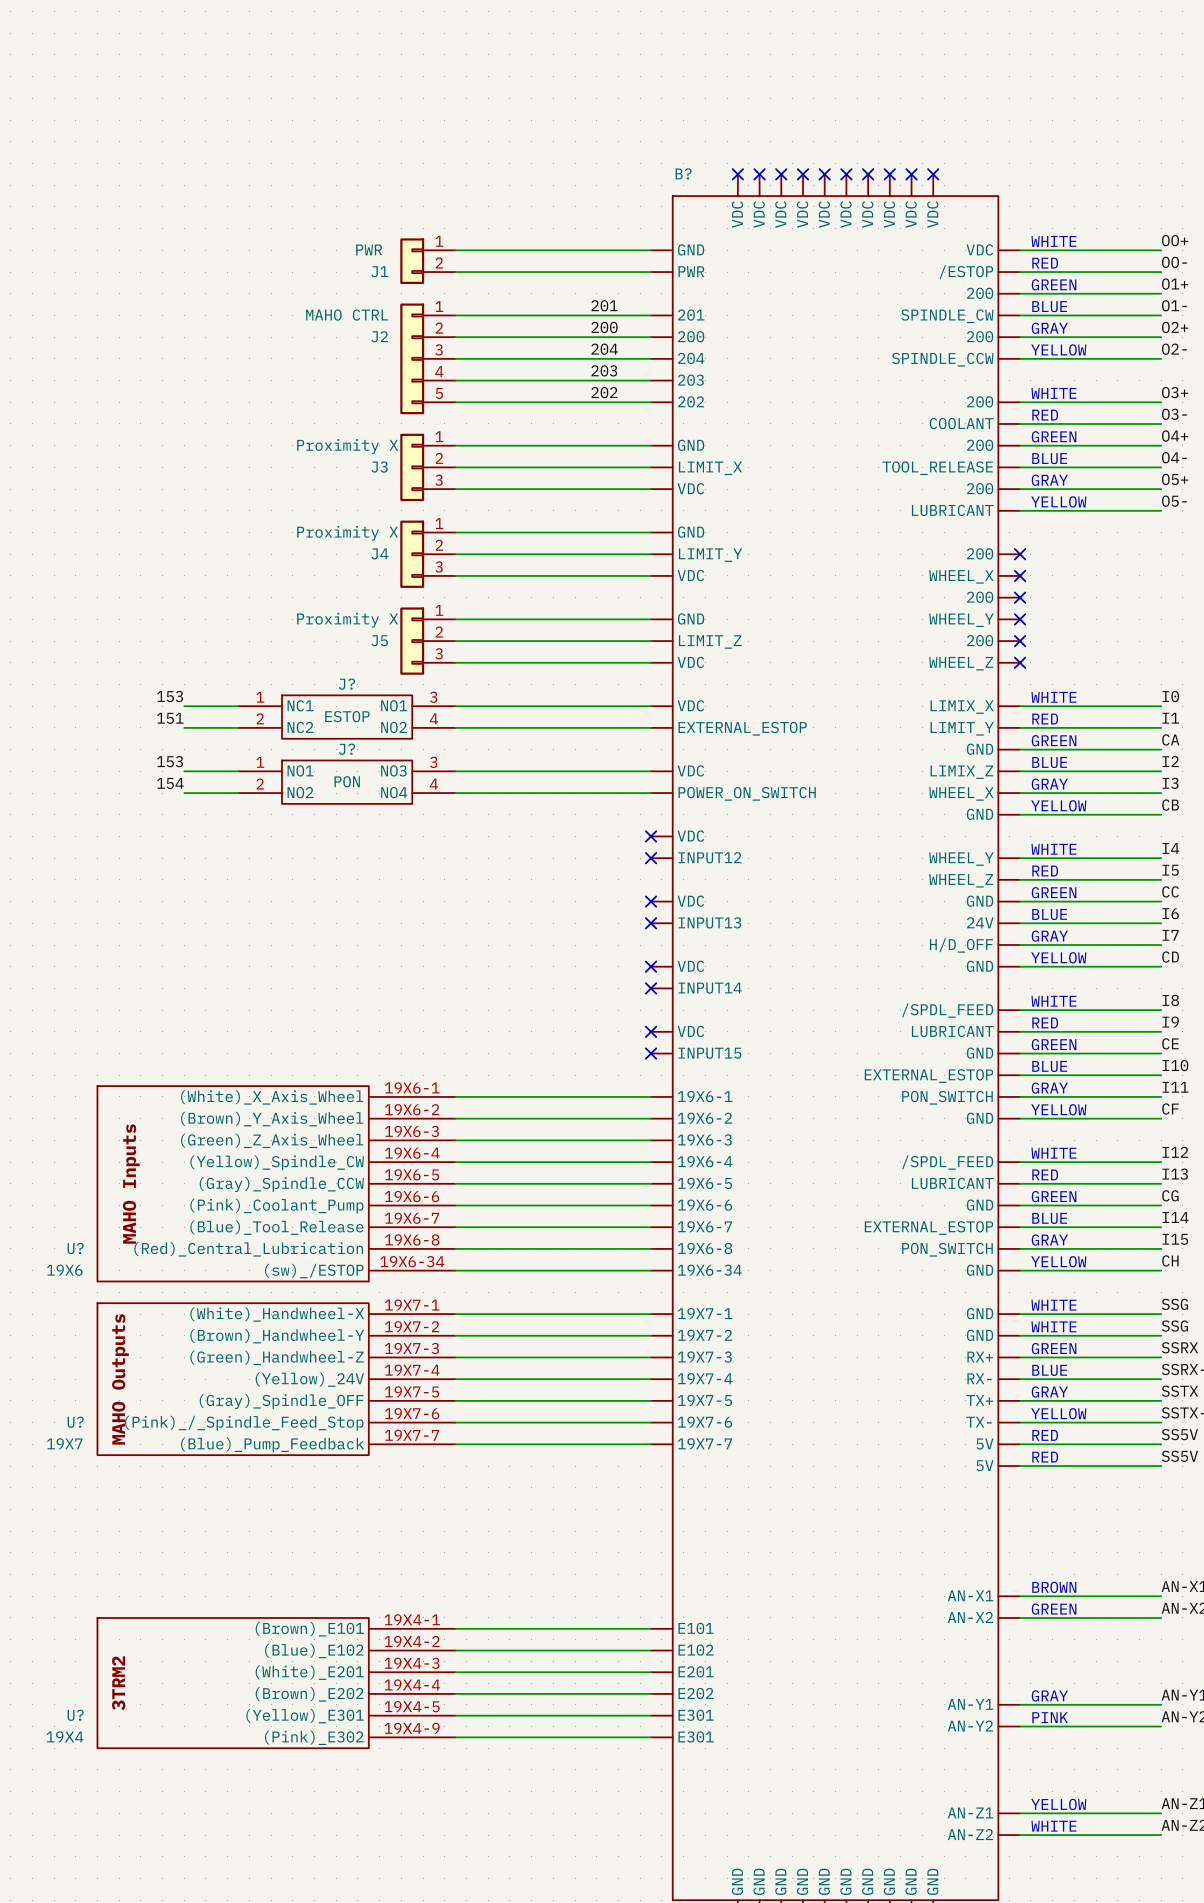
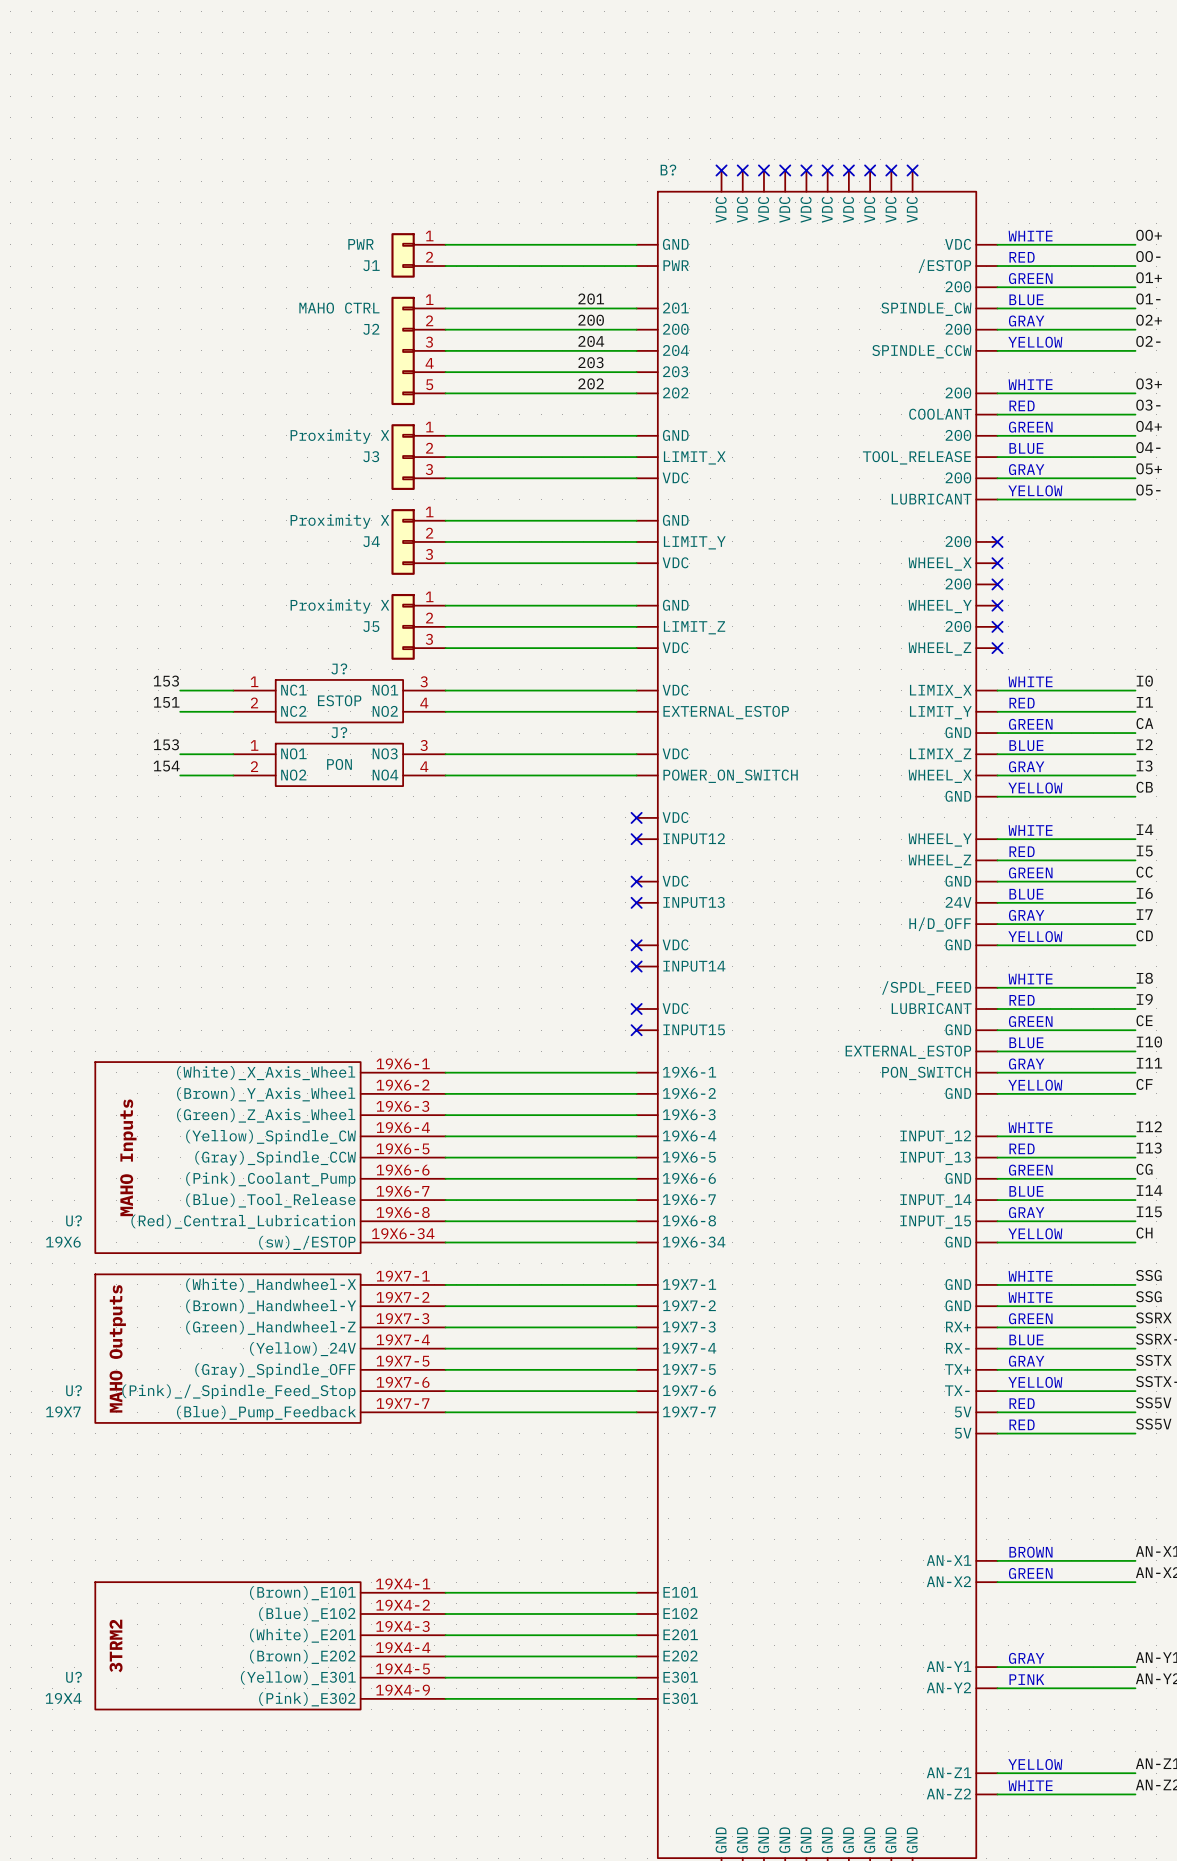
B? pin name: /SPDL_FEED (947, 1162) -> INPUT_12 (935, 1137)
B? pin name: LUBRICANT (952, 1183) -> INPUT_13 (935, 1158)
B? pin name: EXTERNAL_ESTOP (928, 1228) -> INPUT_14 (935, 1200)
B? pin name: PON_SWITCH (947, 1249) -> INPUT_15 (935, 1222)

